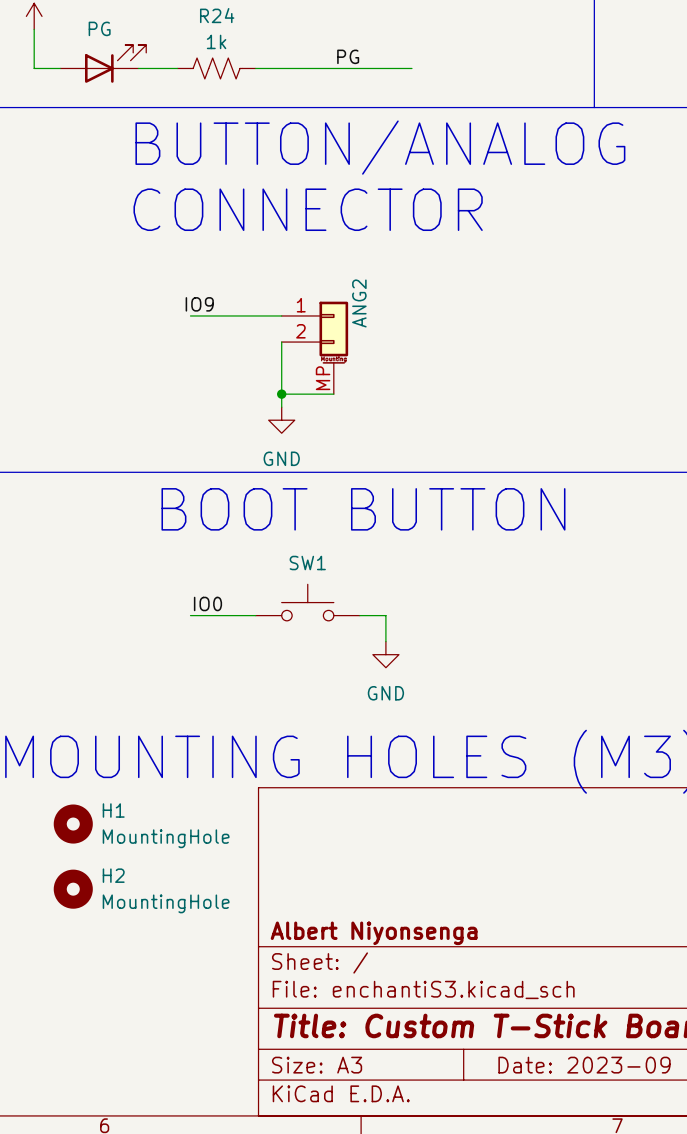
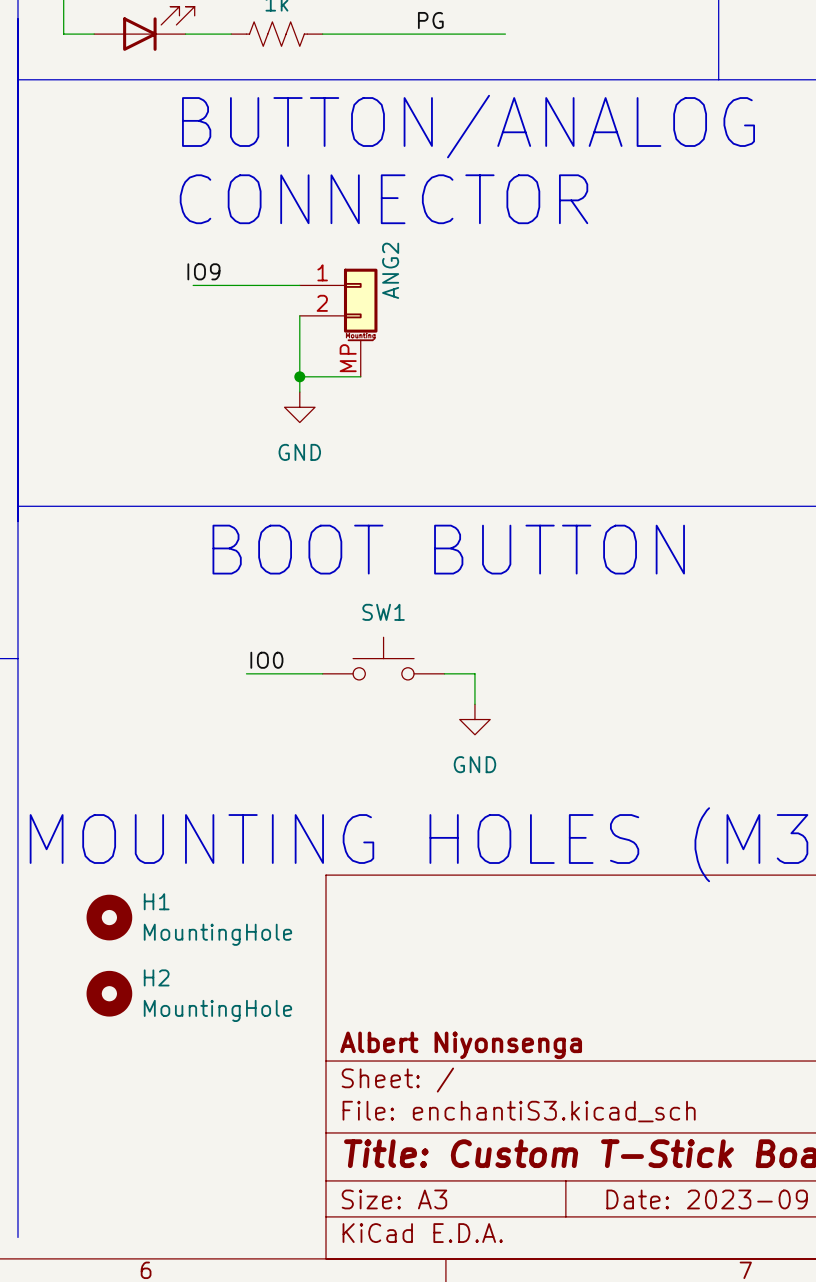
label position: IO9 (199, 304) -> IO9 (203, 271)
wire: (190, 315) (281, 315) -> (193, 285) (299, 285)
wire: (281, 342) (281, 407) -> (299, 315) (299, 392)
ANG2 position: (314, 347) -> (338, 322)
wire: (281, 394) (333, 394) -> (299, 376) (360, 376)
junction position: (281, 394) -> (299, 376)
power symbol position: GND (281, 420) -> GND (299, 407)

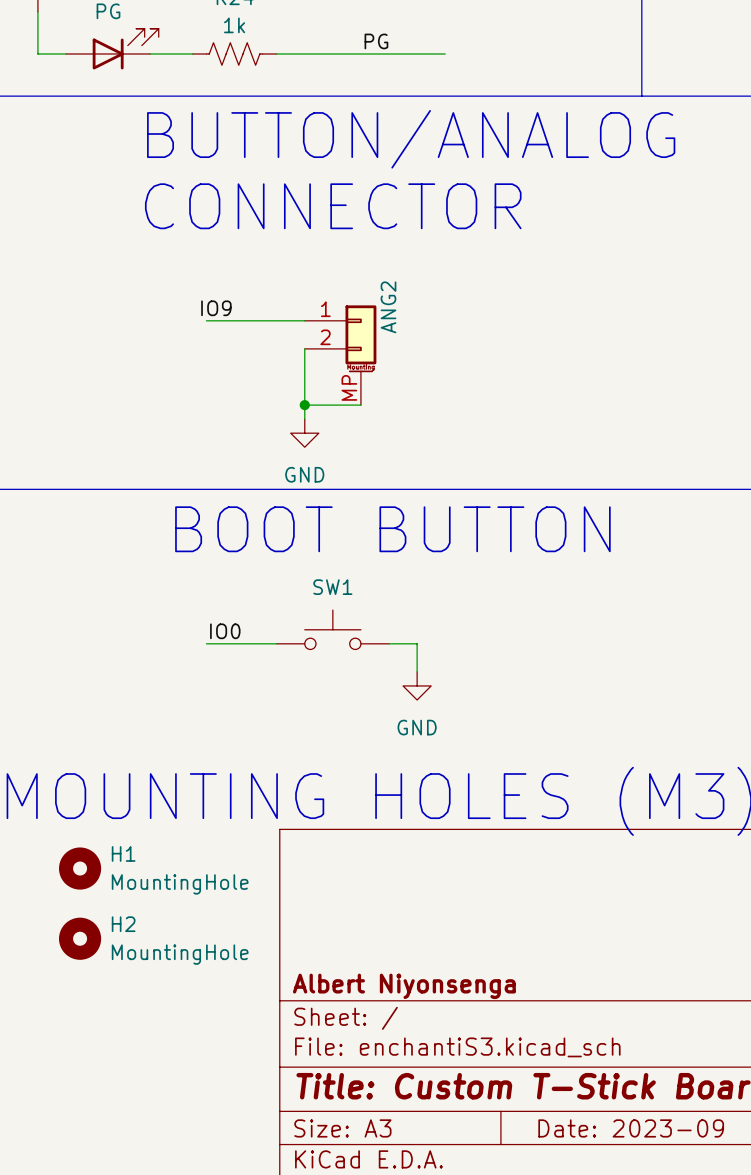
label position: IO9 (203, 271) -> IO9 (216, 308)
wire: (193, 285) (299, 285) -> (206, 320) (304, 320)
wire: (299, 315) (299, 392) -> (304, 348) (304, 419)
ANG2 position: (338, 322) -> (340, 355)
wire: (299, 376) (360, 376) -> (304, 405) (360, 405)
junction position: (299, 376) -> (304, 405)
power symbol position: GND (299, 407) -> GND (304, 433)

